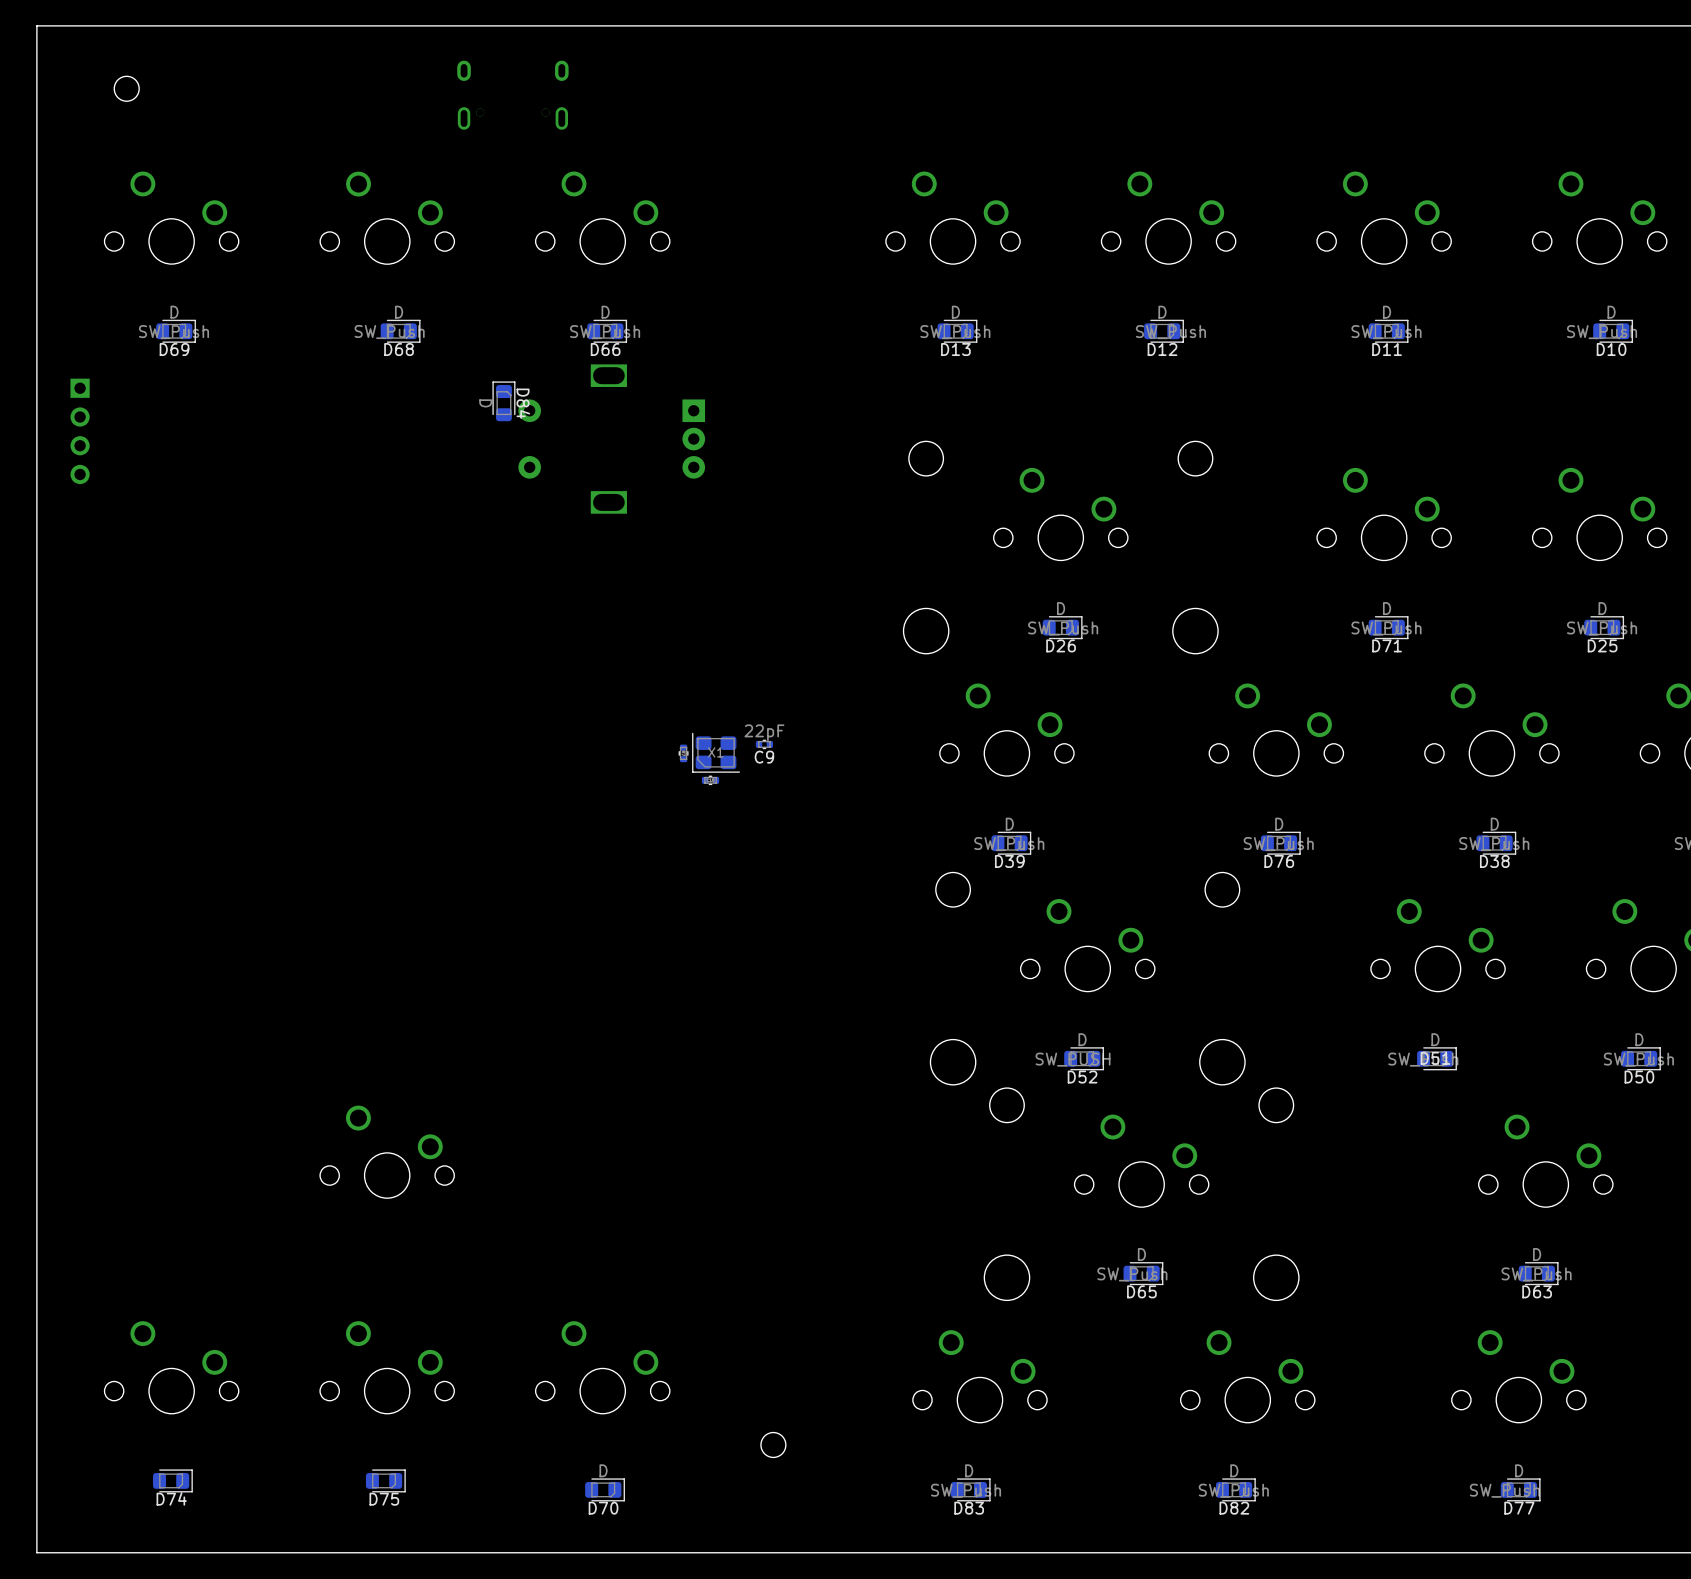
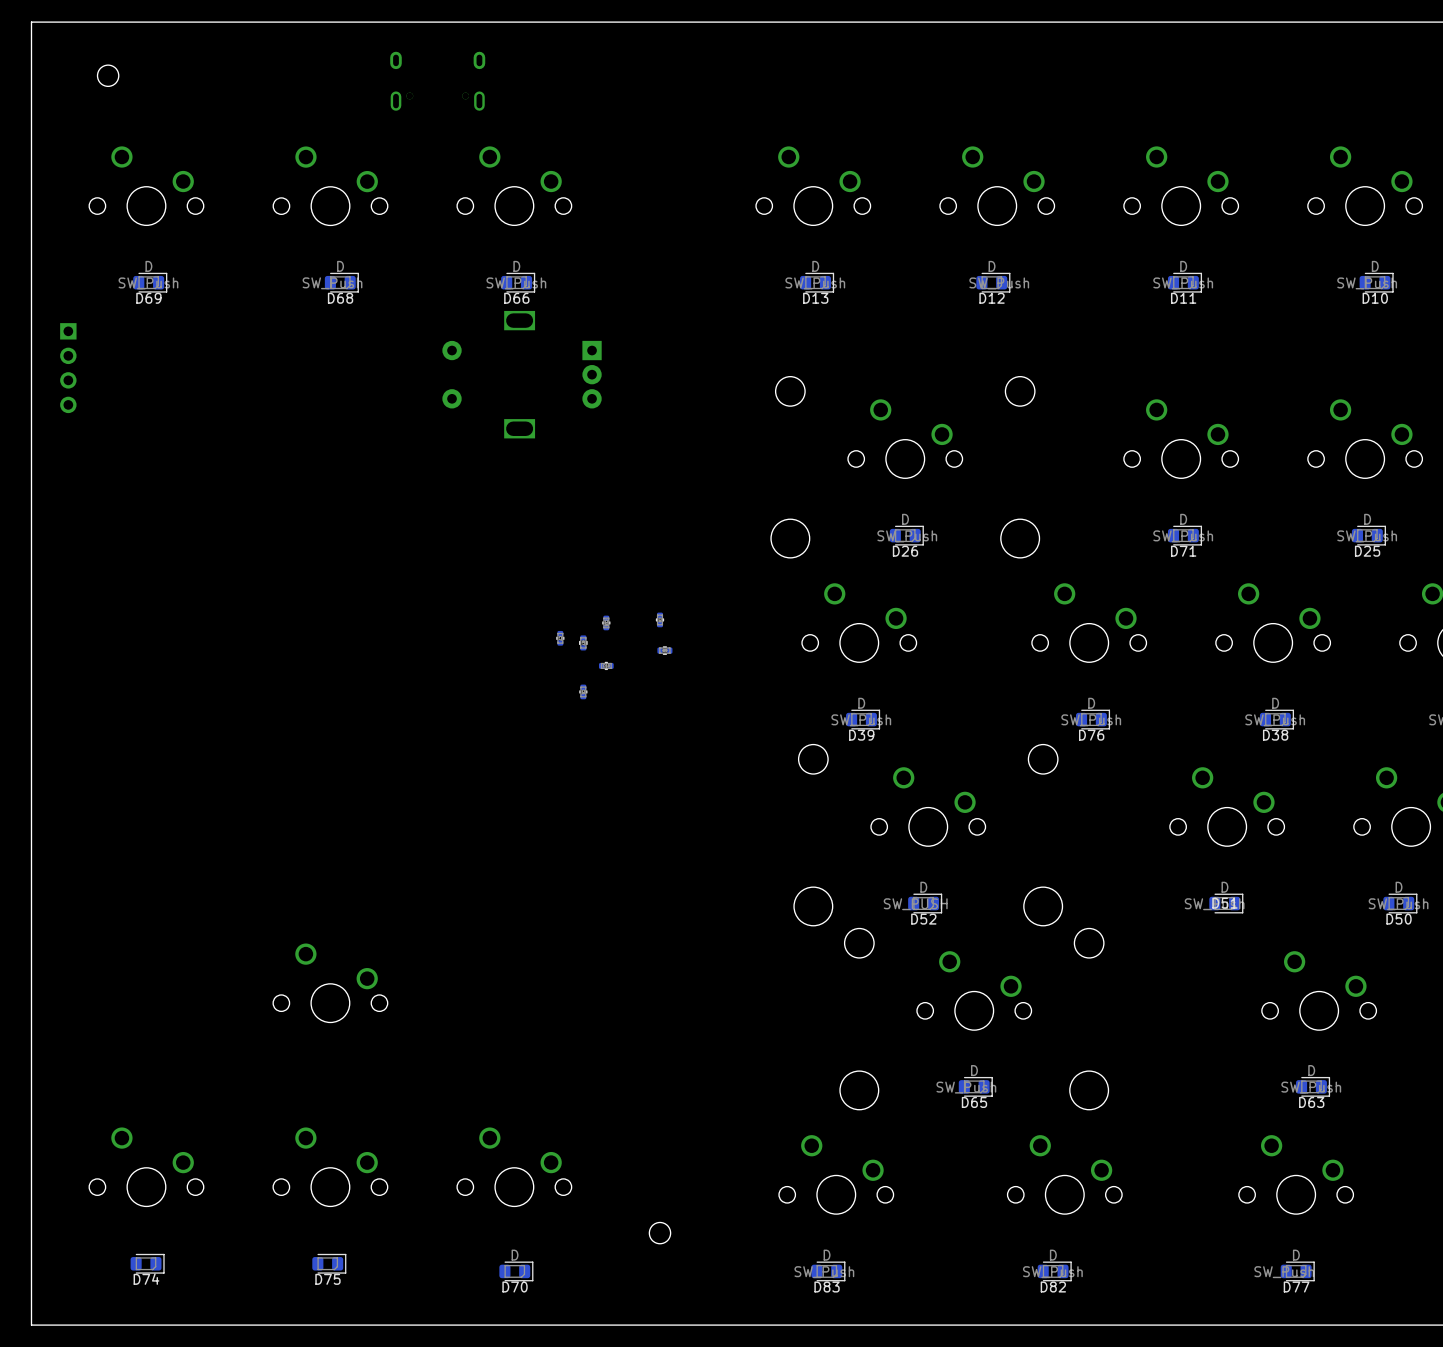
D84: D (503, 401) -> none
part: none -> (659, 619)
part: none -> (606, 622)
C9: 22pF (764, 744) -> none
part: none -> (560, 638)
X1: (716, 752) -> none
part: none -> (664, 650)
part: none -> (583, 691)

